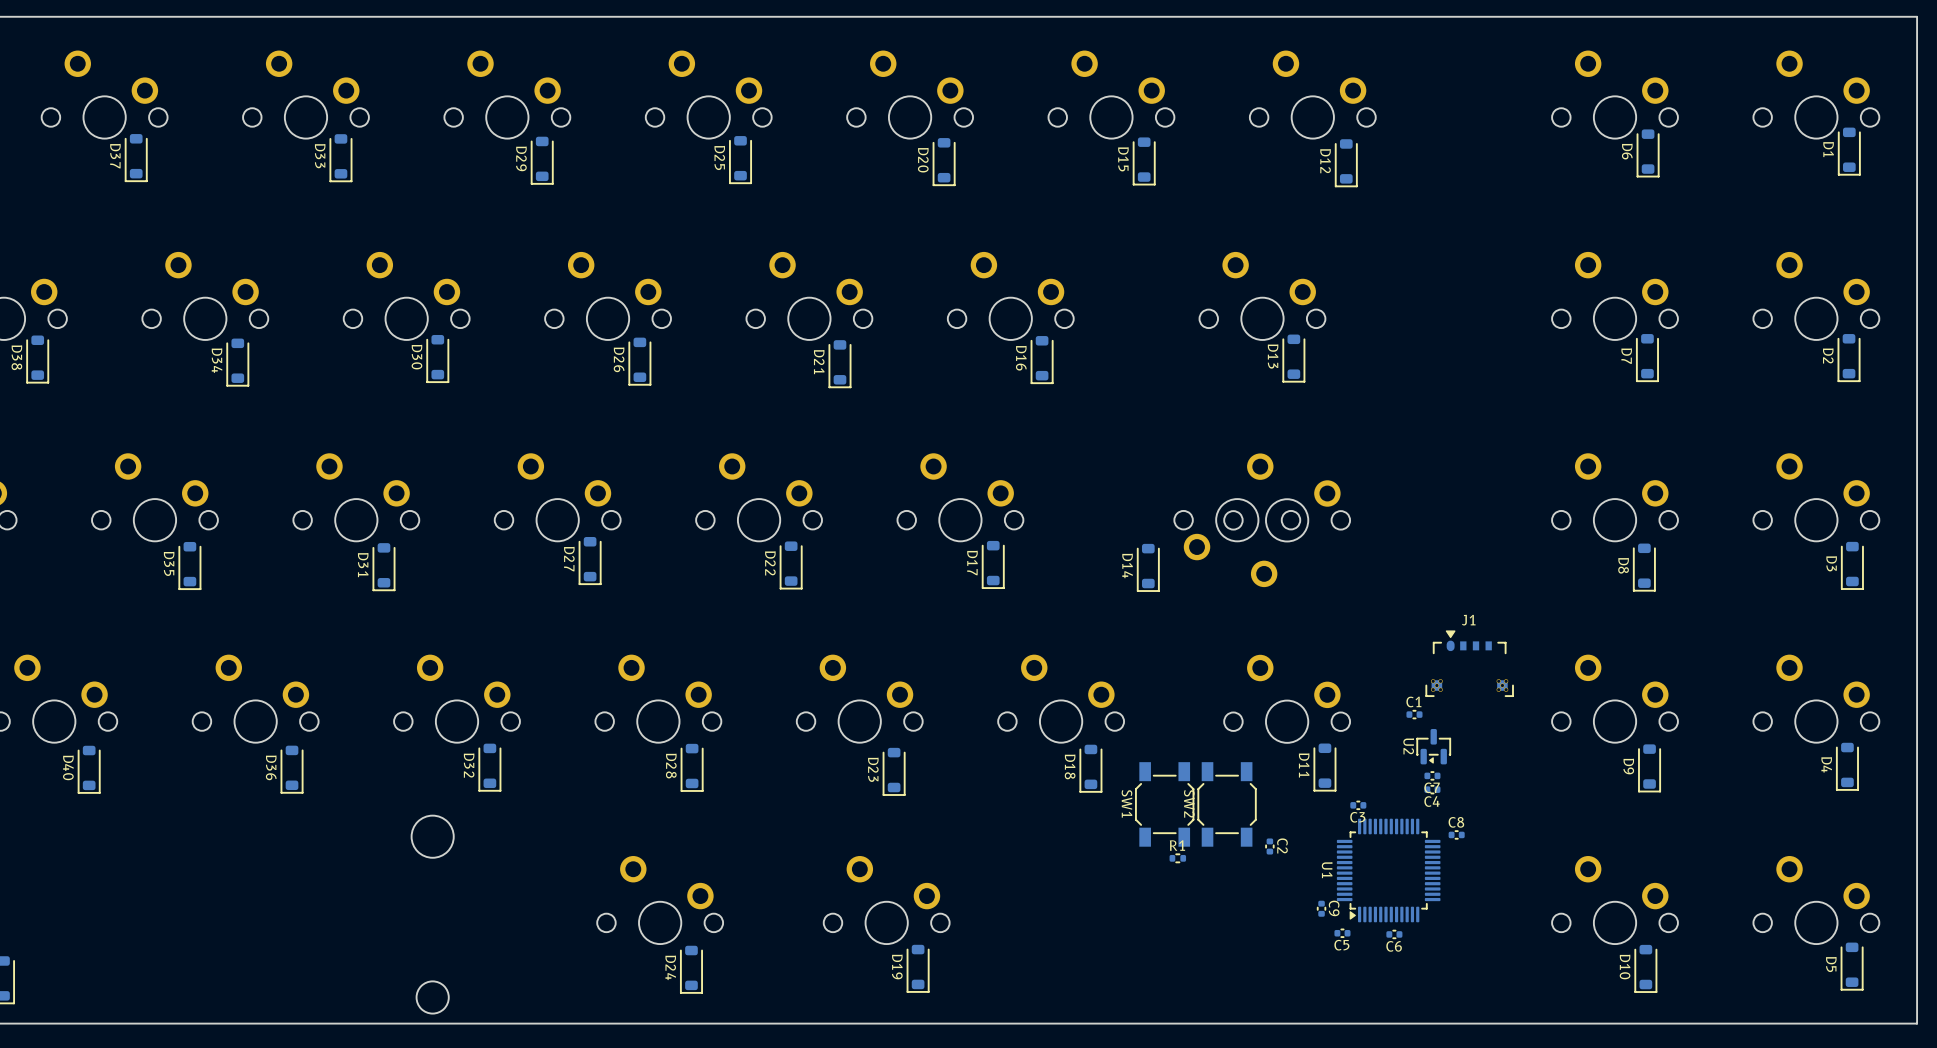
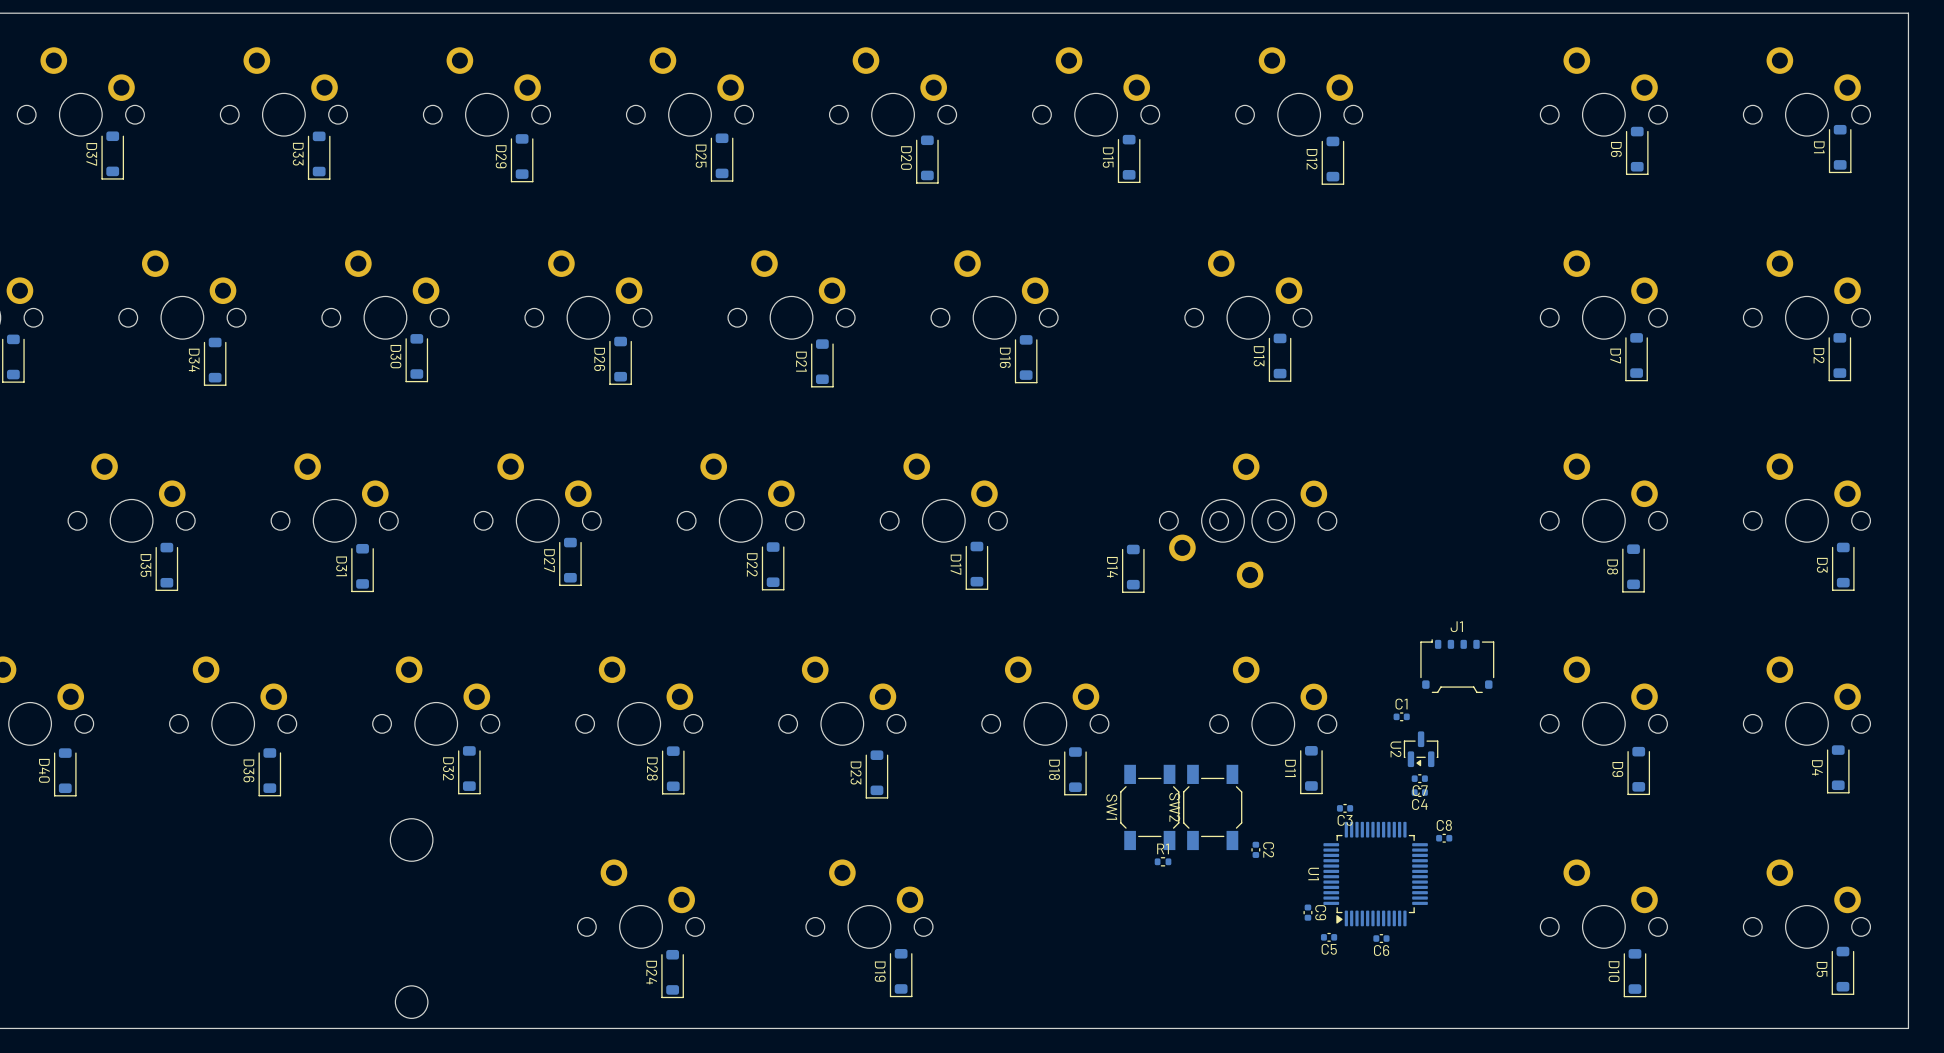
J1 footprint: [1425, 630, 1514, 697] -> [1420, 639, 1495, 694]

